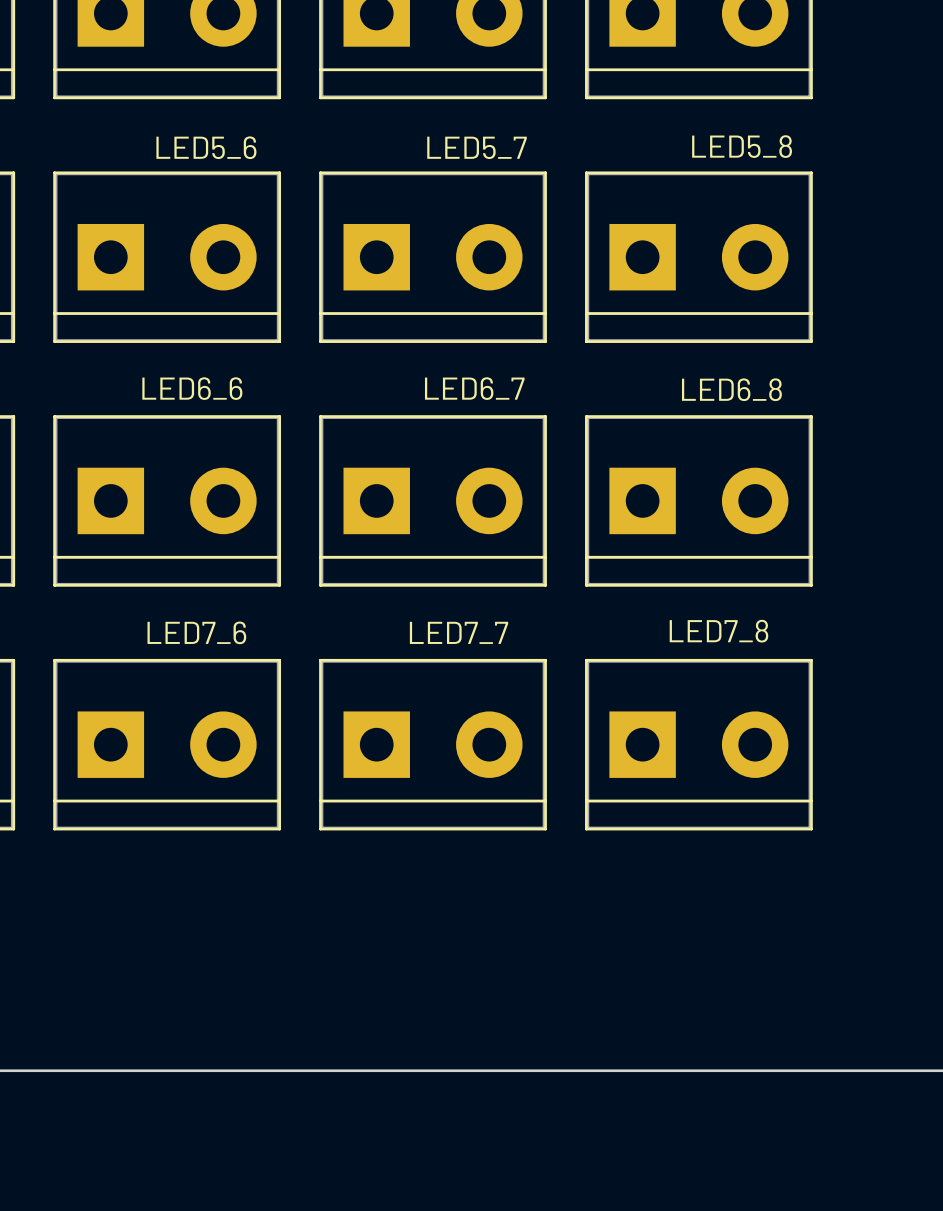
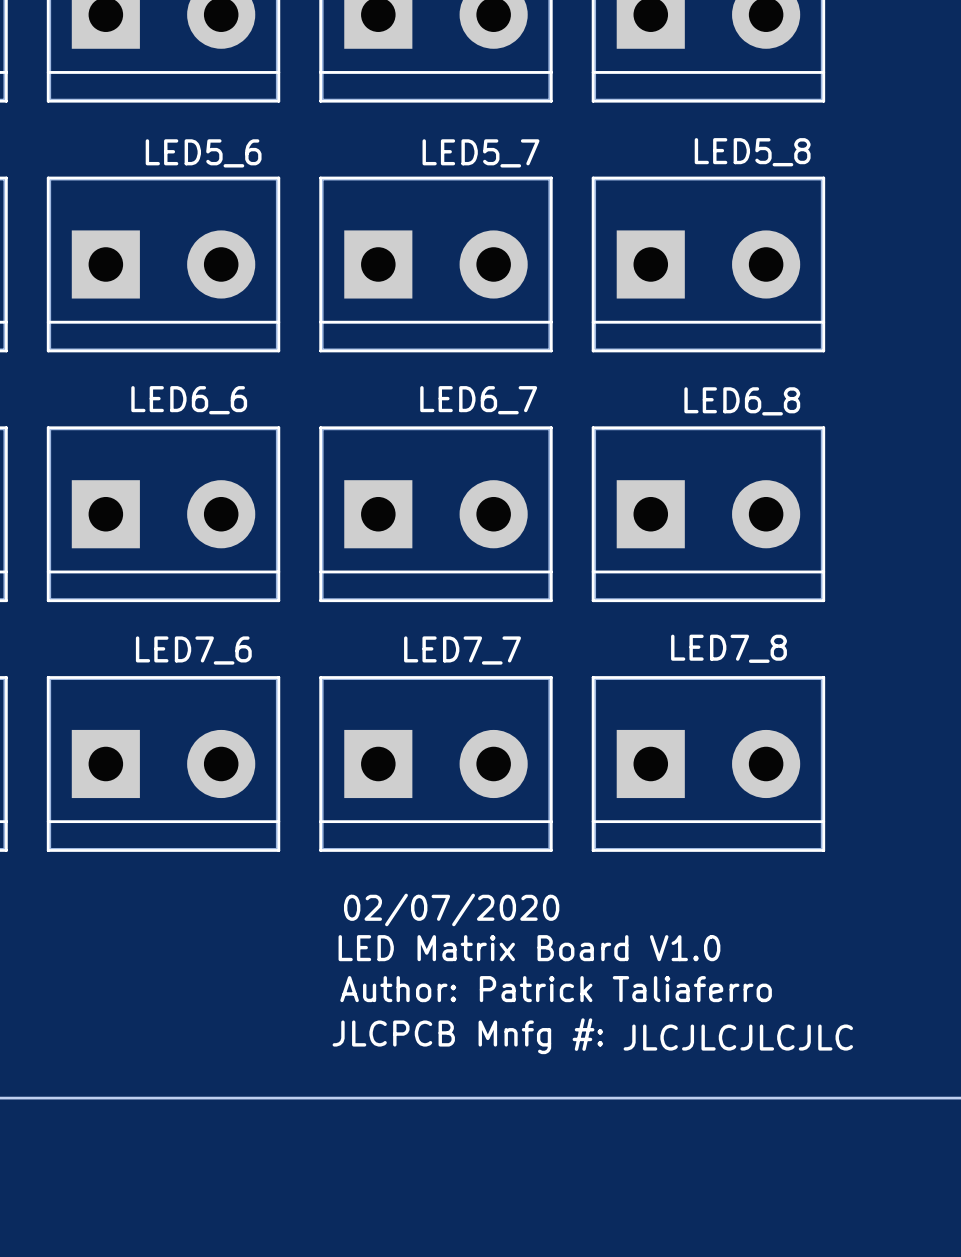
text: none -> 02/07/2020 (451, 909)
text: none -> LED Matrix Board V1.0 (529, 948)
text: none -> Author: Patrick Taliaferro (556, 989)
text: none -> JLCPCB Mnfg #: (467, 1036)
text: none -> JLCJLCJLCJLC (738, 1037)

